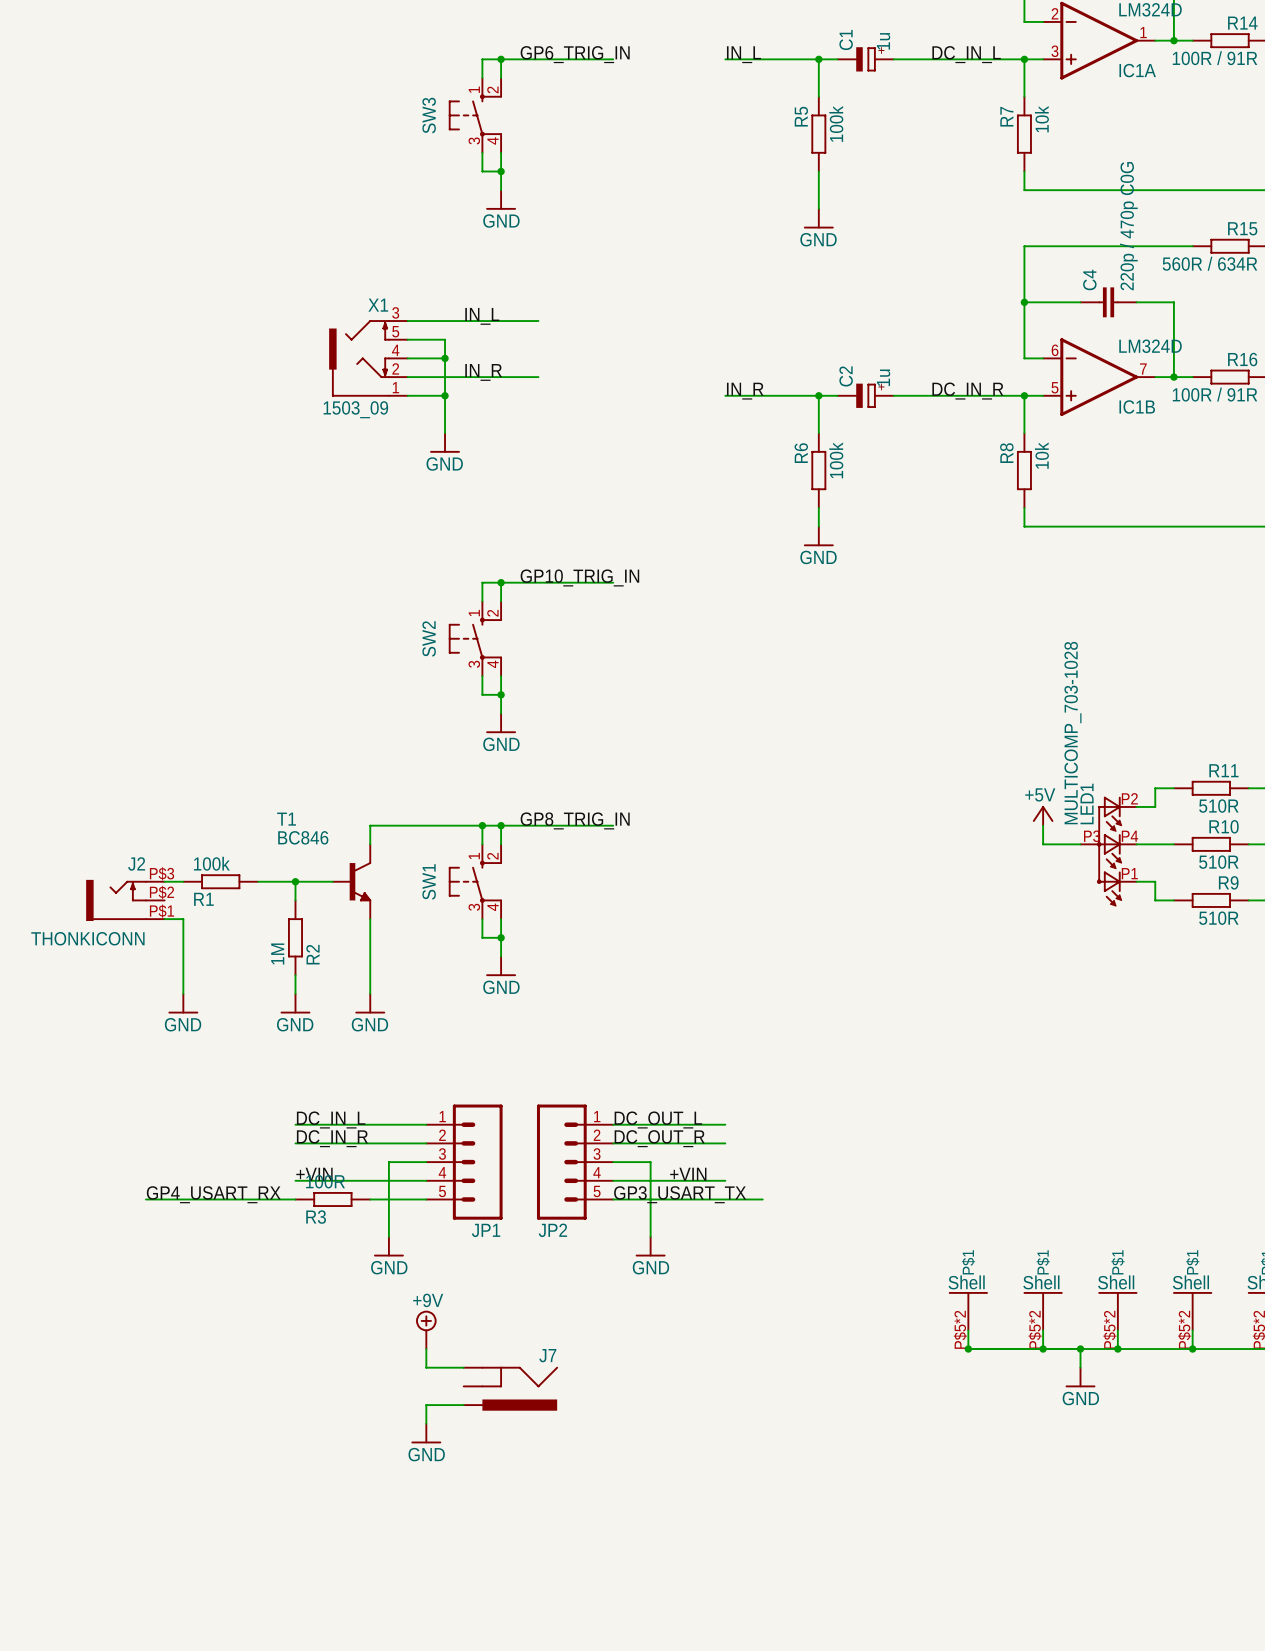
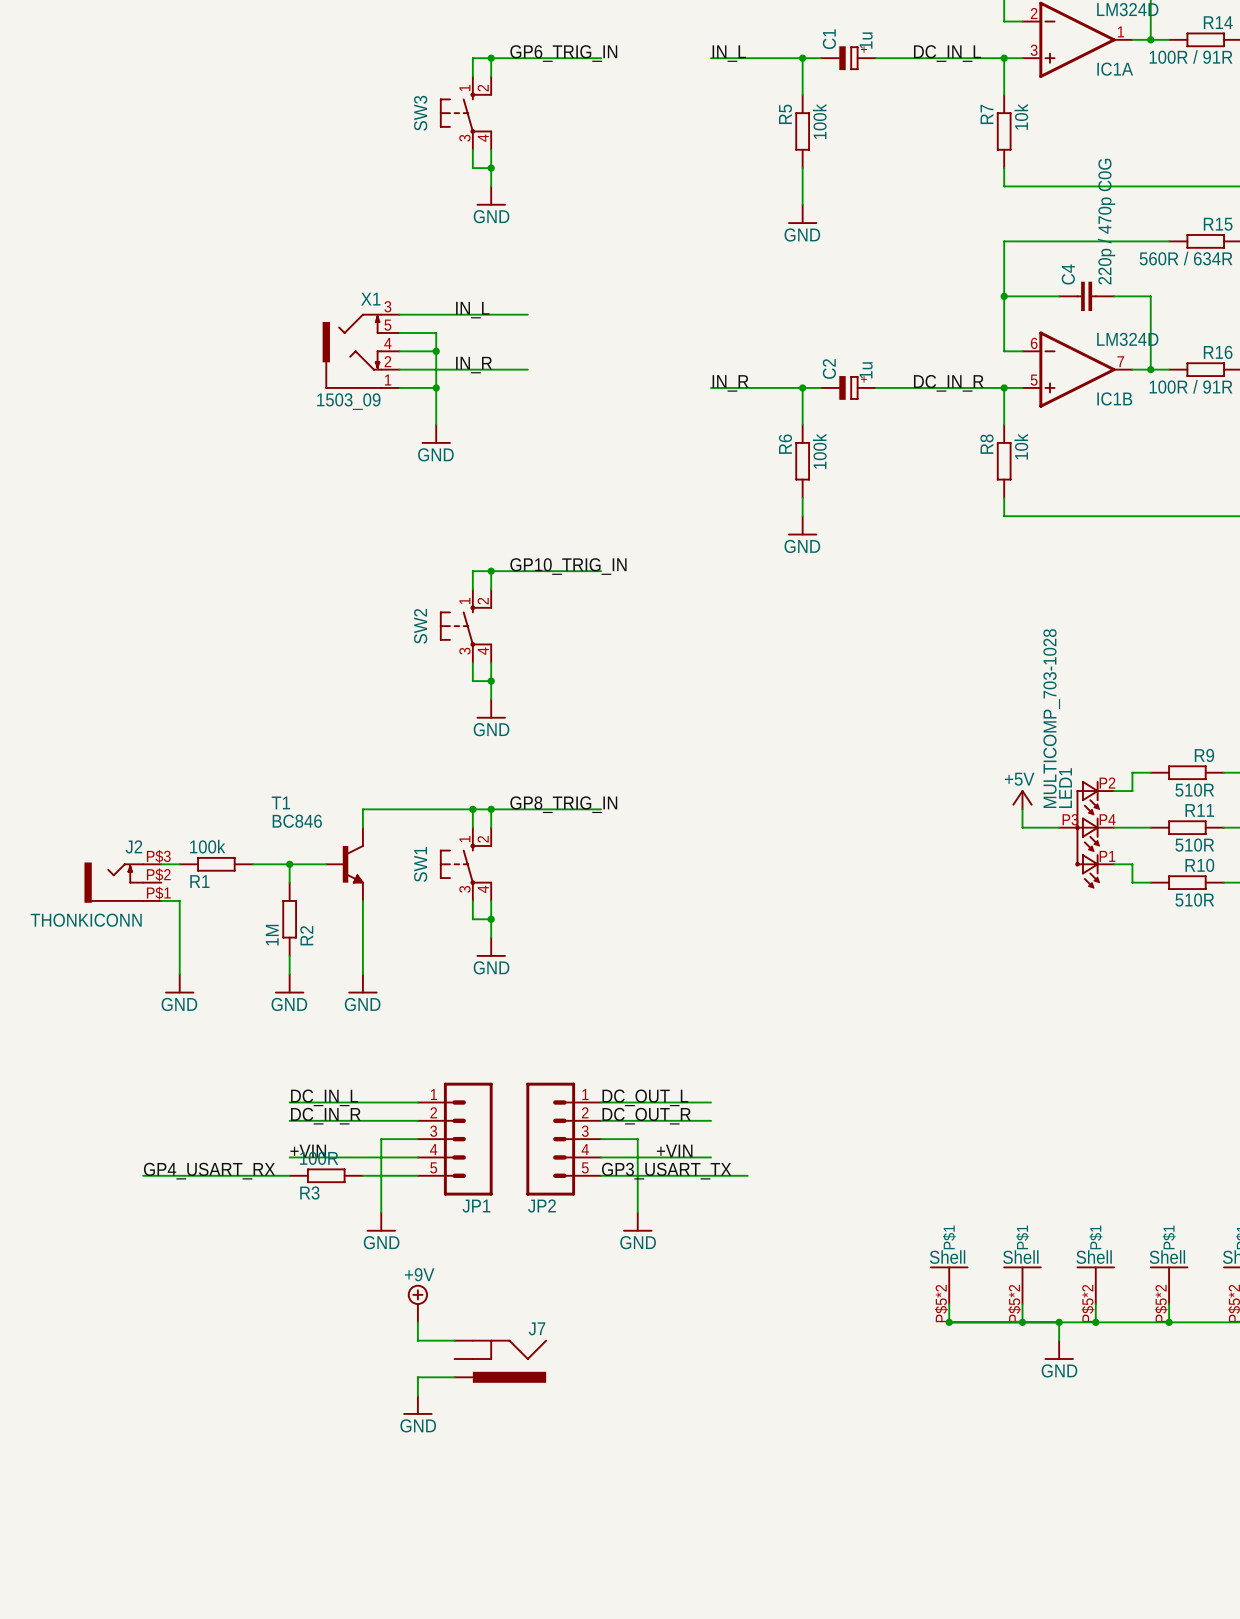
R11 name: R11 (1223, 770) -> R9 (1204, 755)
R10 name: R10 (1224, 826) -> R11 (1199, 810)
R9 name: R9 (1228, 882) -> R10 (1199, 865)

